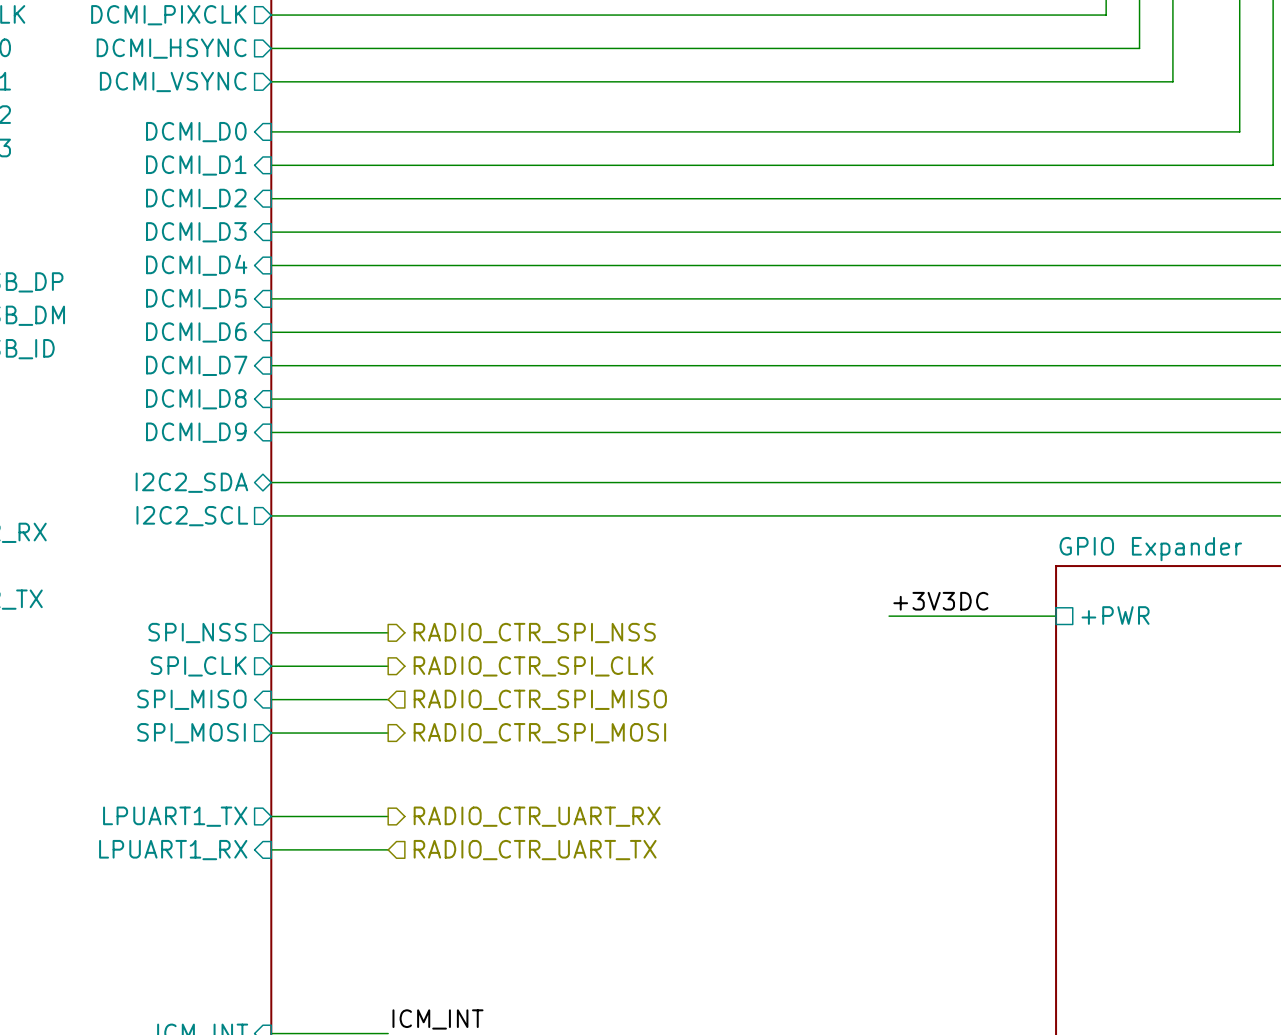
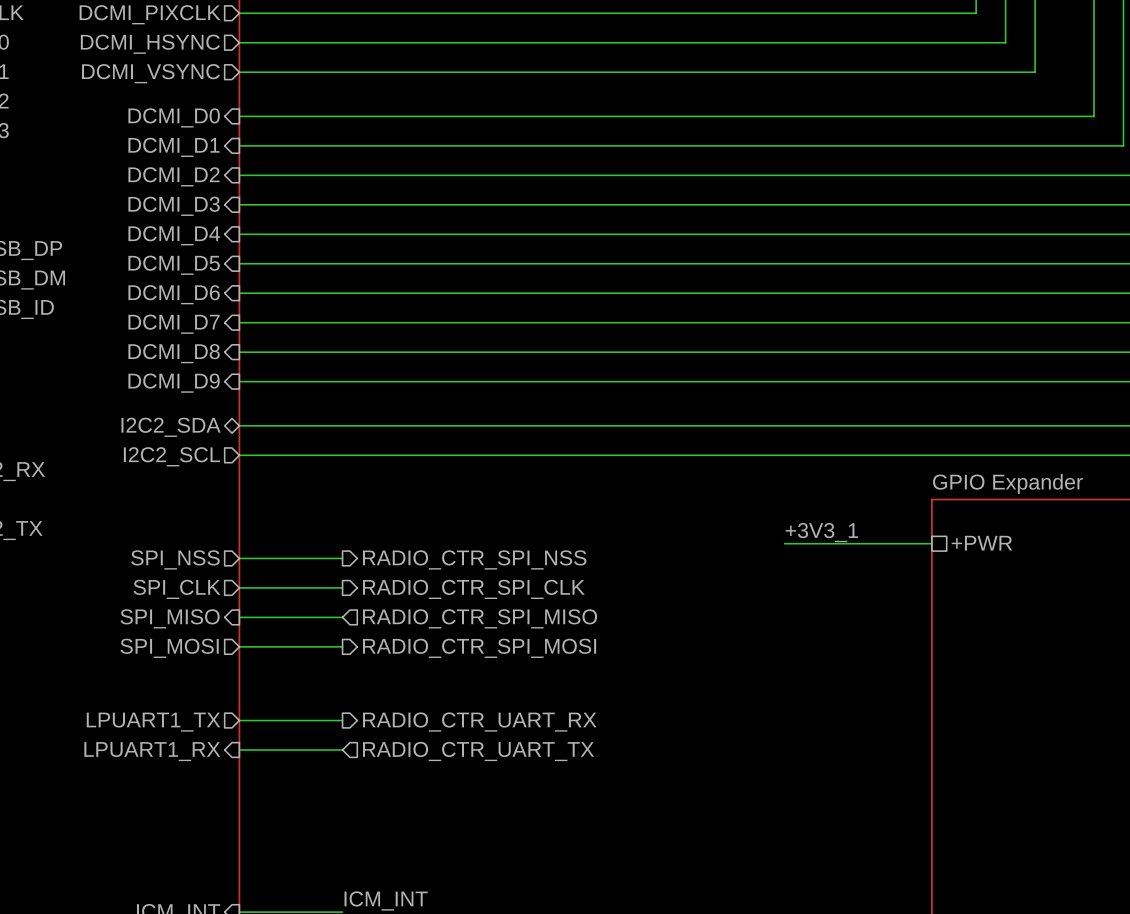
label: +3V3DC (940, 601) -> +3V3_1 (821, 532)

